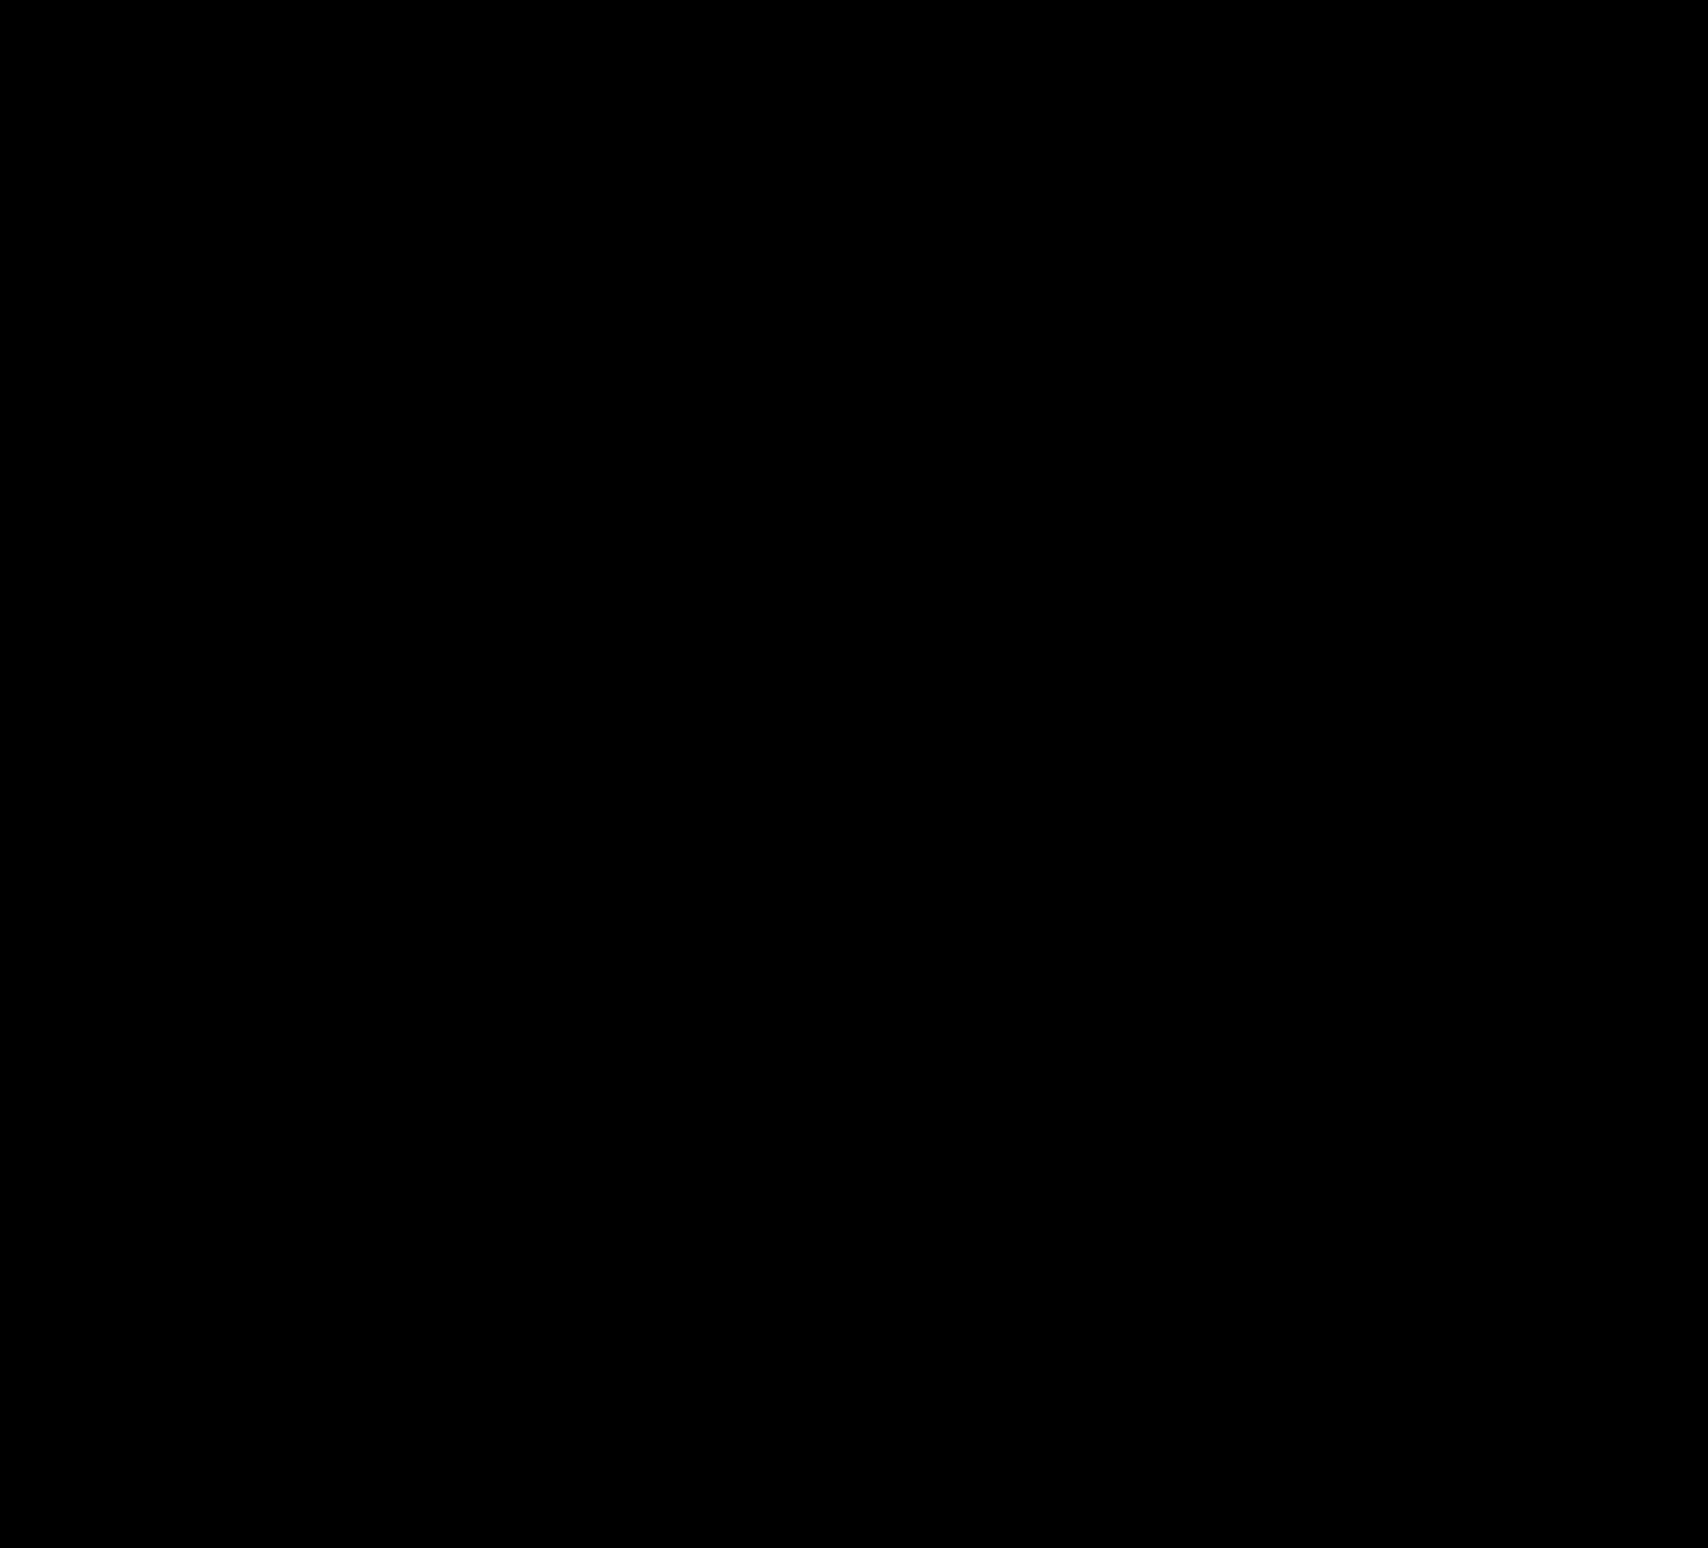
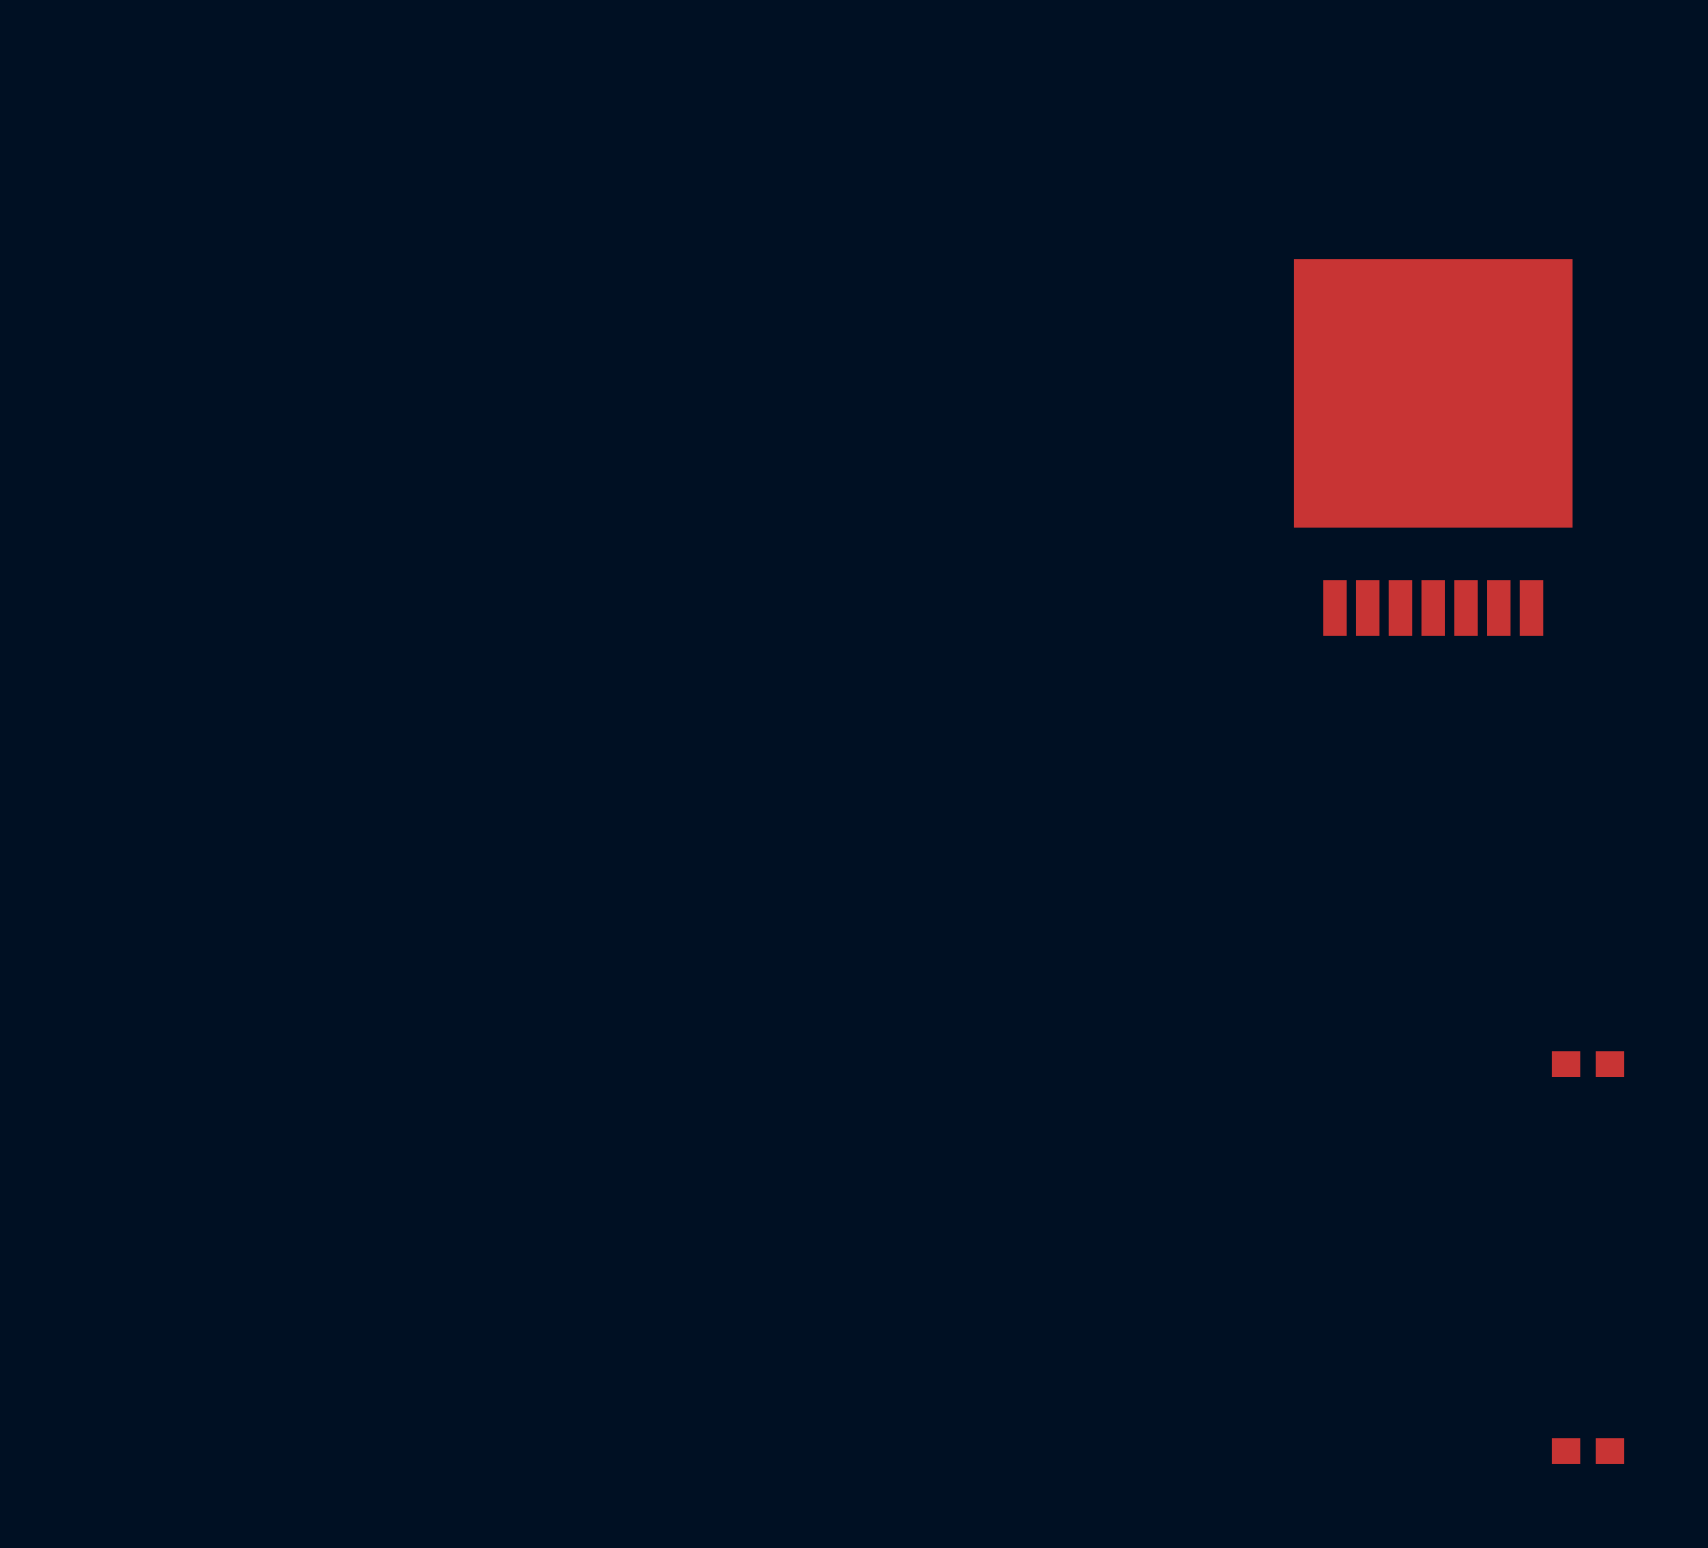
part: none -> (1433, 447)
part: none -> (1588, 1064)
part: none -> (1588, 1451)

